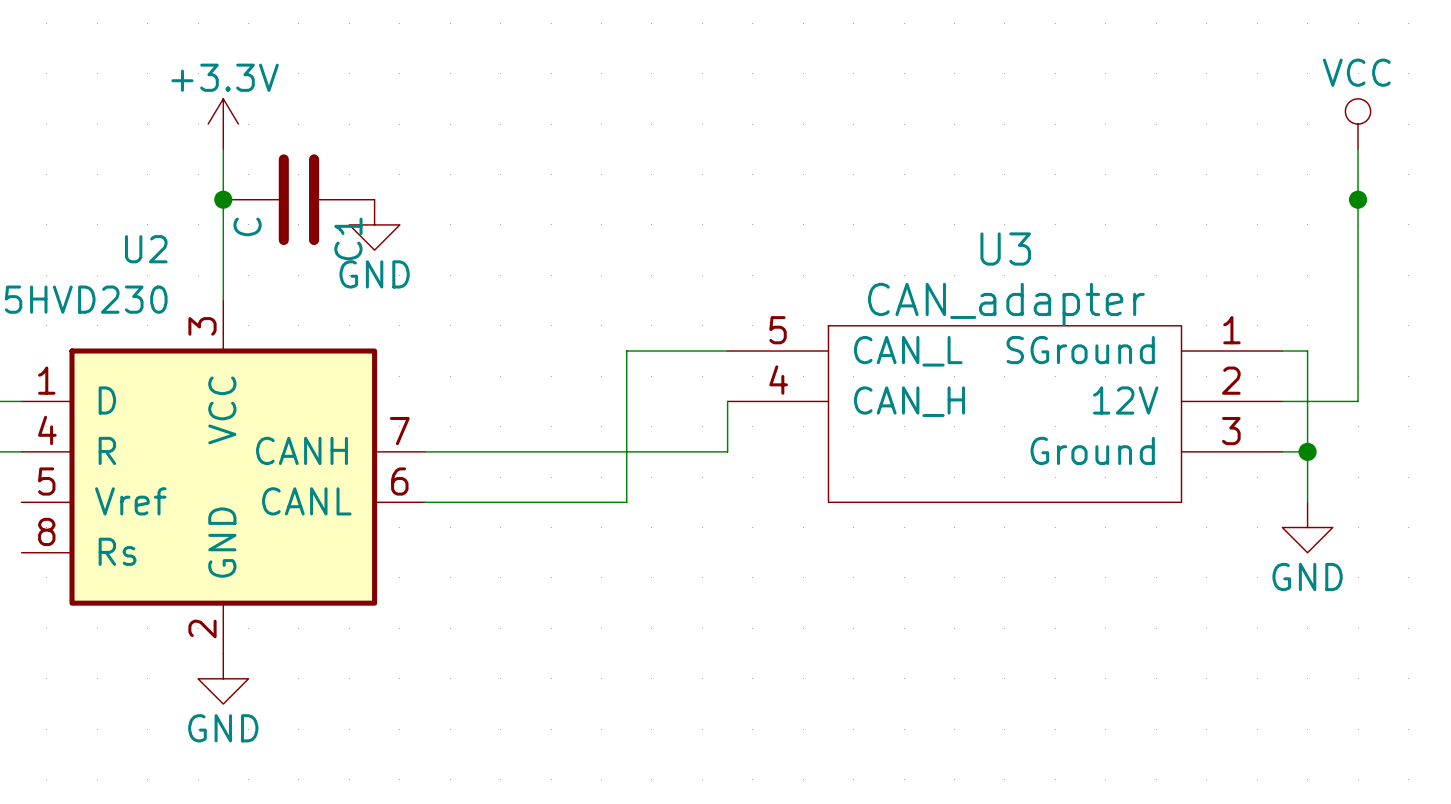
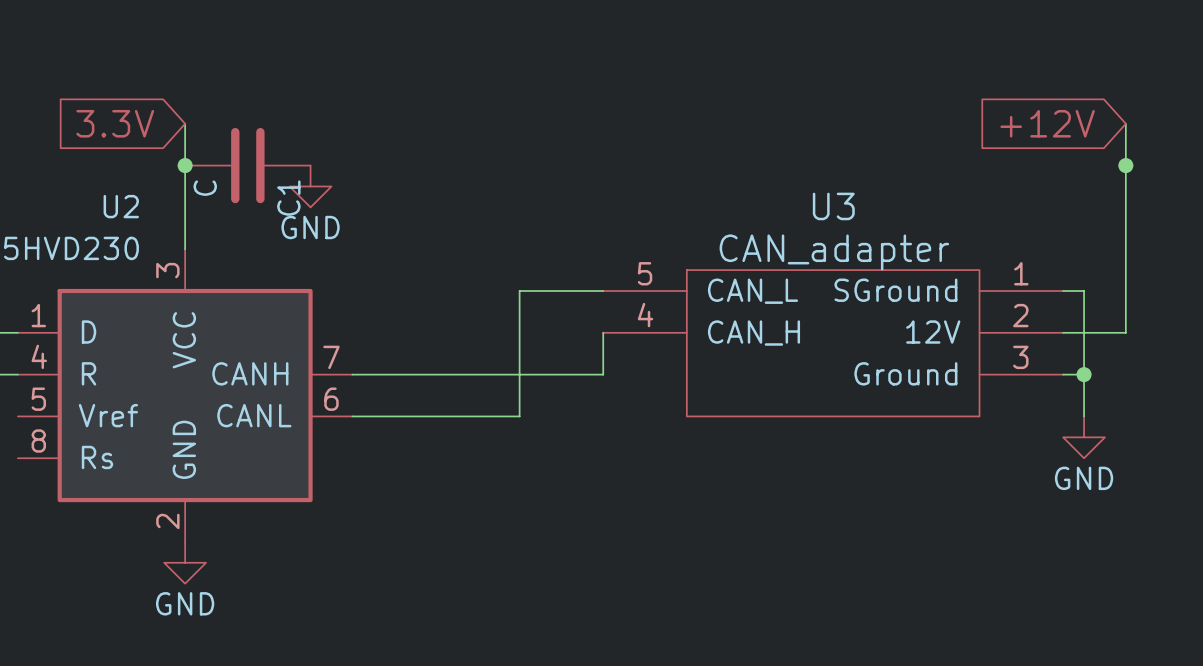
power symbol: +3.3V (223, 124) -> none
power symbol: VCC (1358, 124) -> none
global label: none -> 3.3V (115, 123)
global label: none -> +12V (1047, 123)

